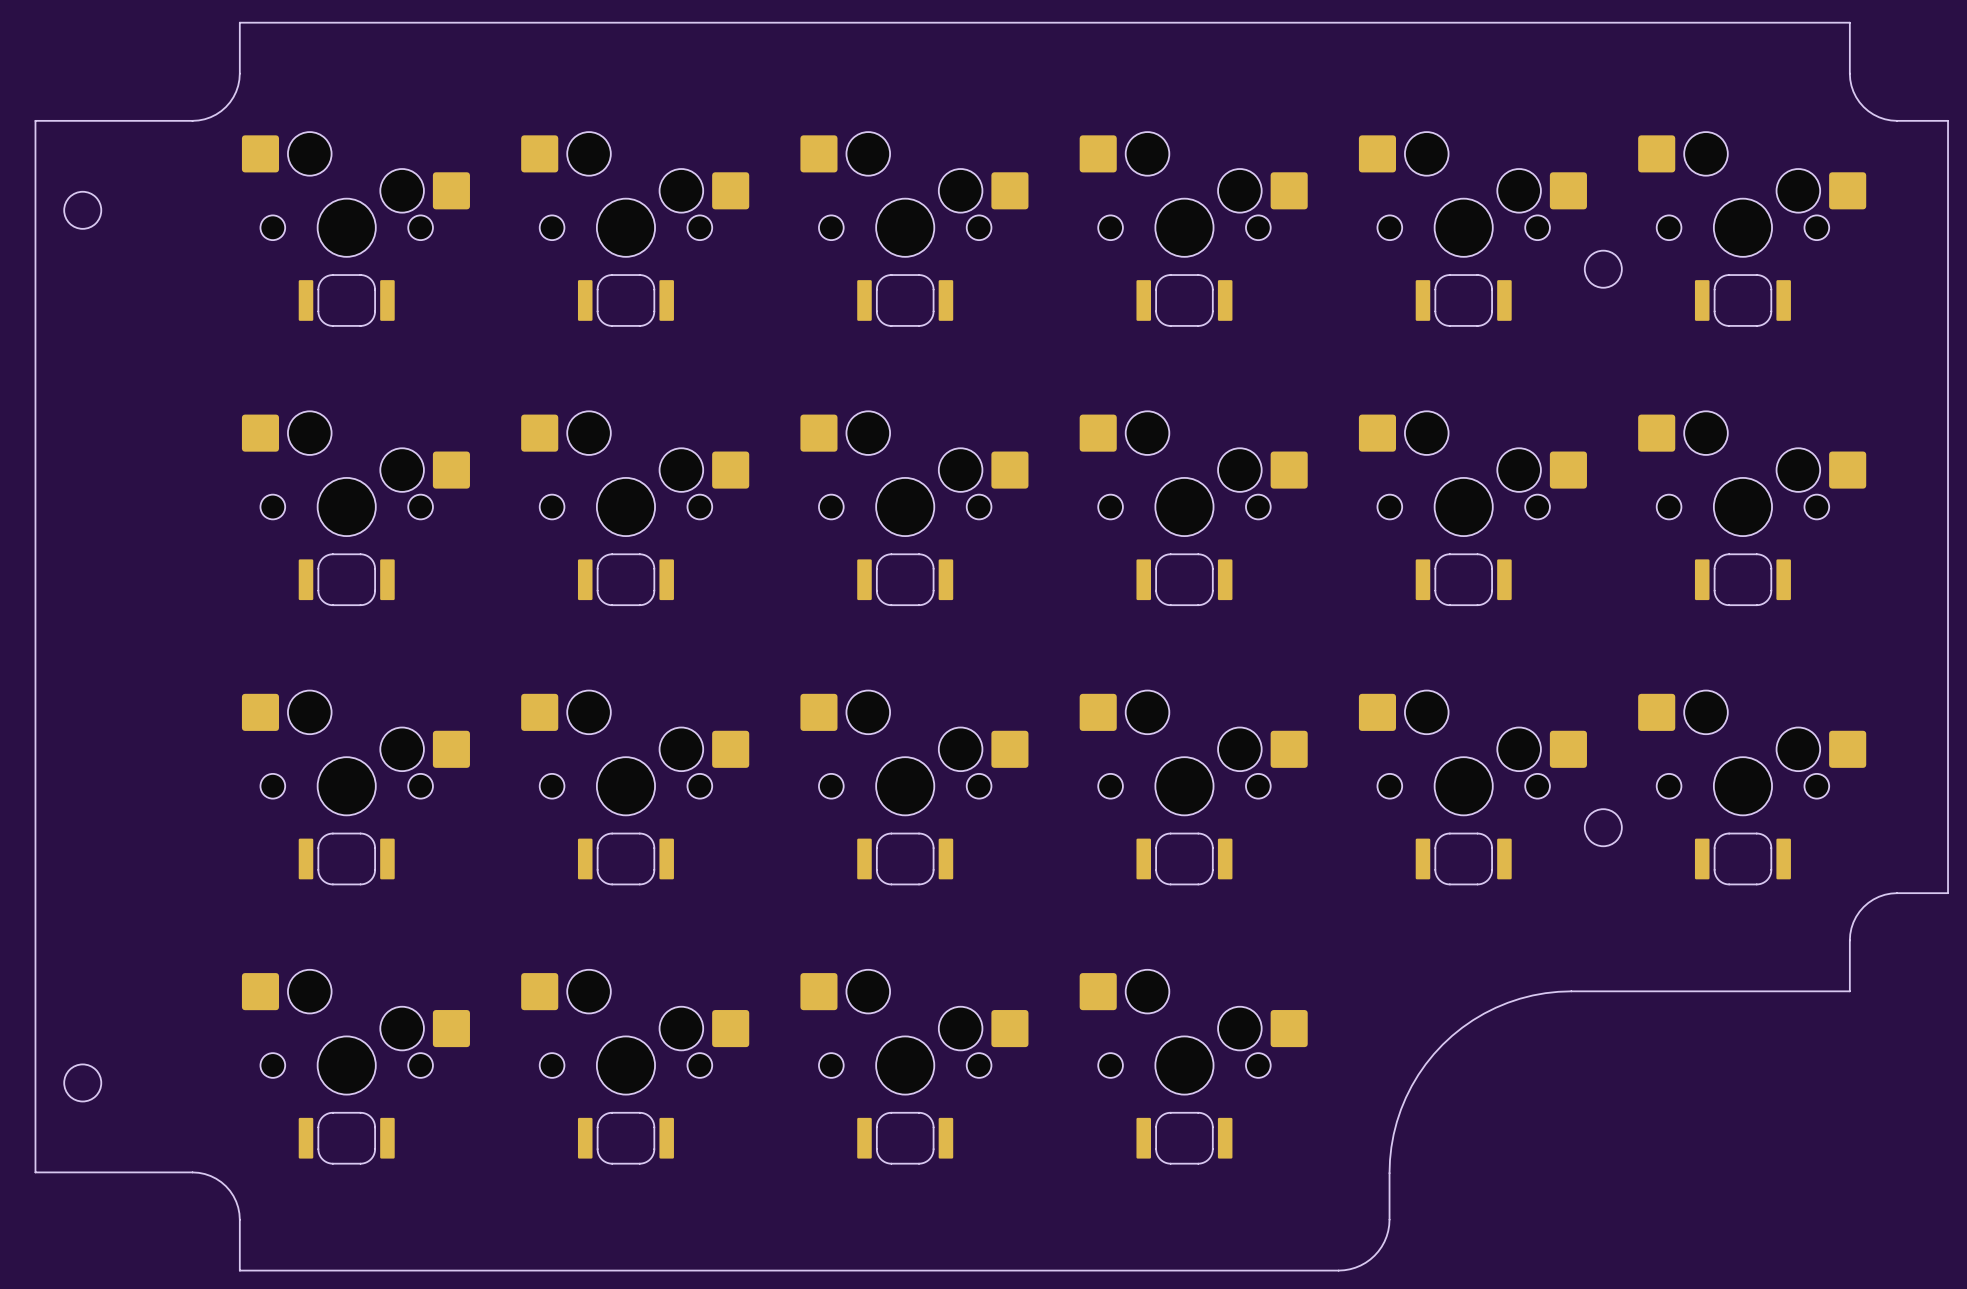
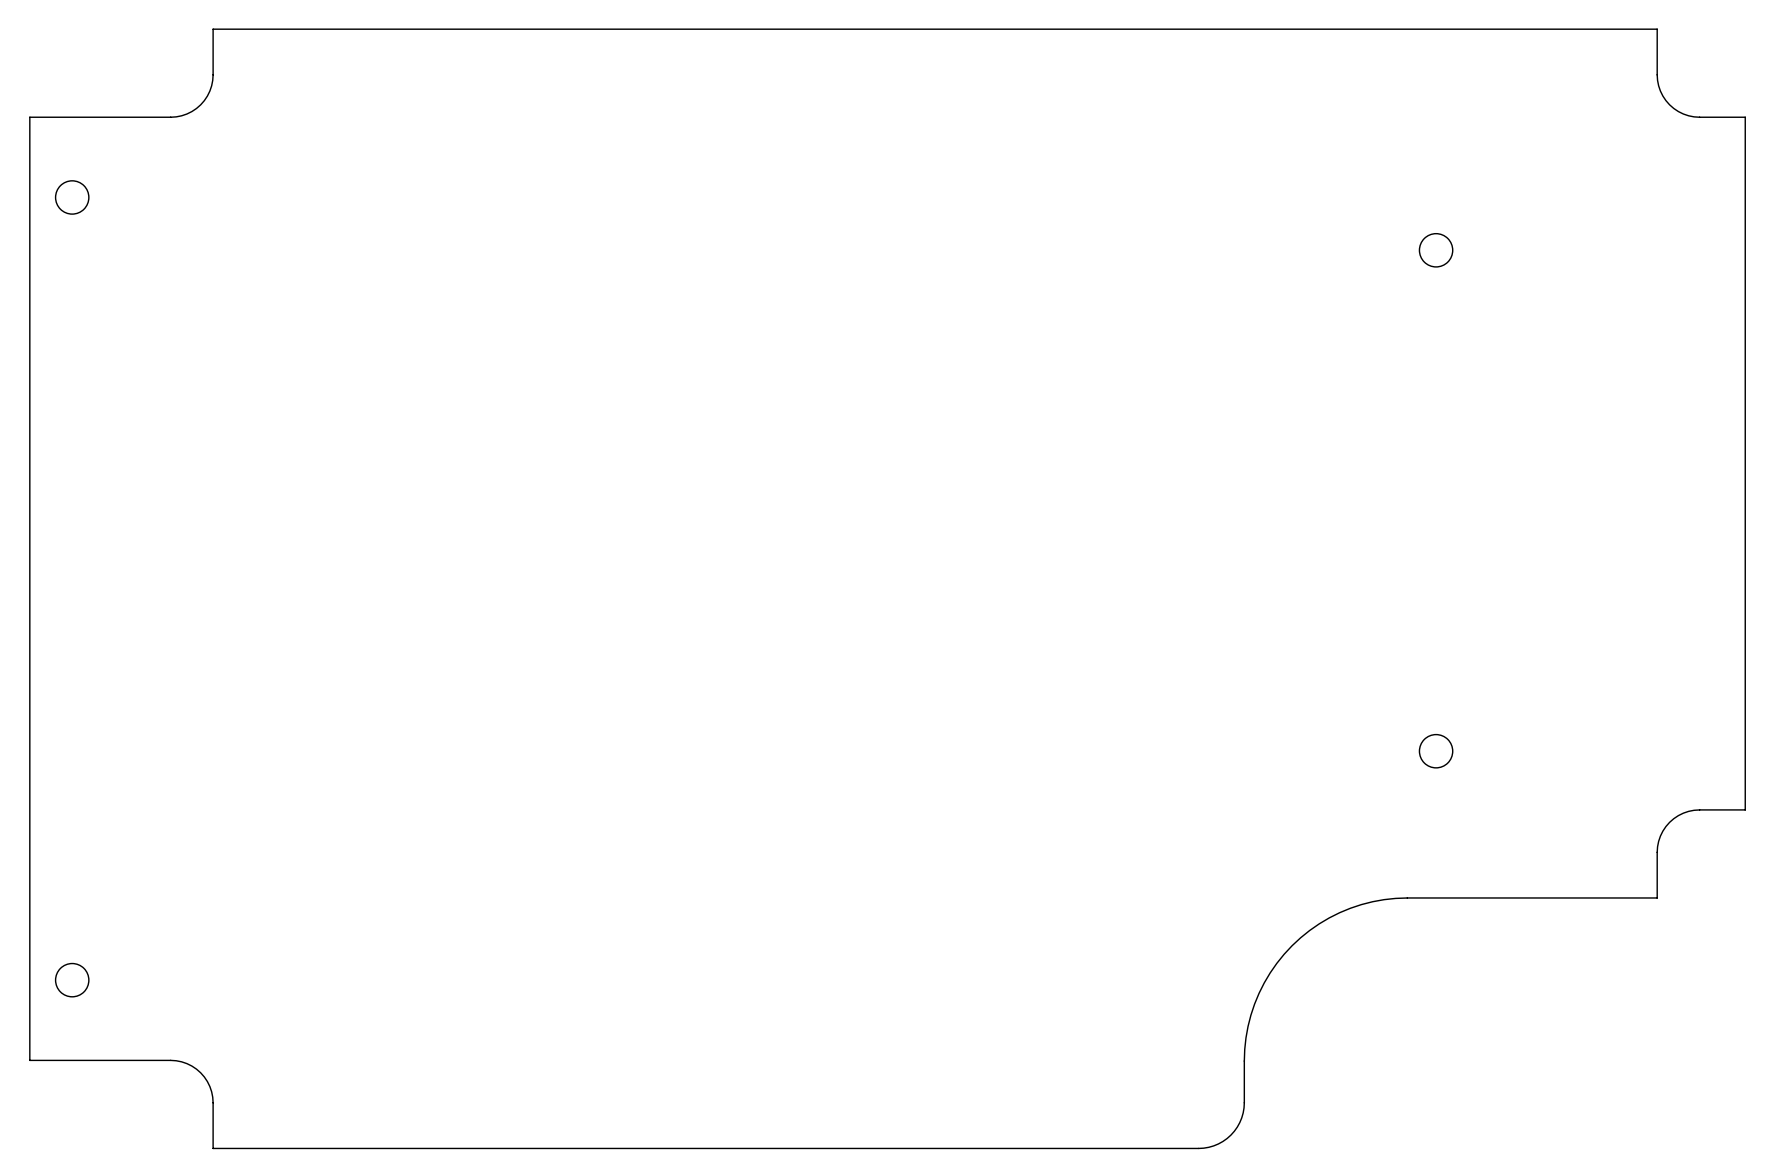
part: (355, 194) -> none
part: (635, 194) -> none
part: (914, 194) -> none
part: (1193, 194) -> none
part: (1472, 194) -> none
part: (1752, 194) -> none
part: (346, 300) -> none
part: (625, 300) -> none
part: (905, 300) -> none
part: (1184, 300) -> none
part: (1463, 300) -> none
part: (1742, 300) -> none
part: (355, 473) -> none
part: (635, 473) -> none
part: (914, 473) -> none
part: (1193, 473) -> none
part: (1472, 473) -> none
part: (1752, 473) -> none
part: (346, 579) -> none
part: (625, 579) -> none
part: (905, 579) -> none
part: (1184, 579) -> none
part: (1463, 579) -> none
part: (1742, 579) -> none
part: (355, 752) -> none
part: (635, 752) -> none
part: (914, 752) -> none
part: (1193, 752) -> none
part: (1472, 752) -> none
part: (1752, 752) -> none
part: (346, 858) -> none
part: (625, 858) -> none
part: (905, 858) -> none
part: (1184, 858) -> none
part: (1463, 858) -> none
part: (1742, 858) -> none
part: (355, 1032) -> none
part: (635, 1032) -> none
part: (914, 1032) -> none
part: (1193, 1032) -> none
part: (346, 1138) -> none
part: (625, 1138) -> none
part: (905, 1138) -> none
part: (1184, 1138) -> none

